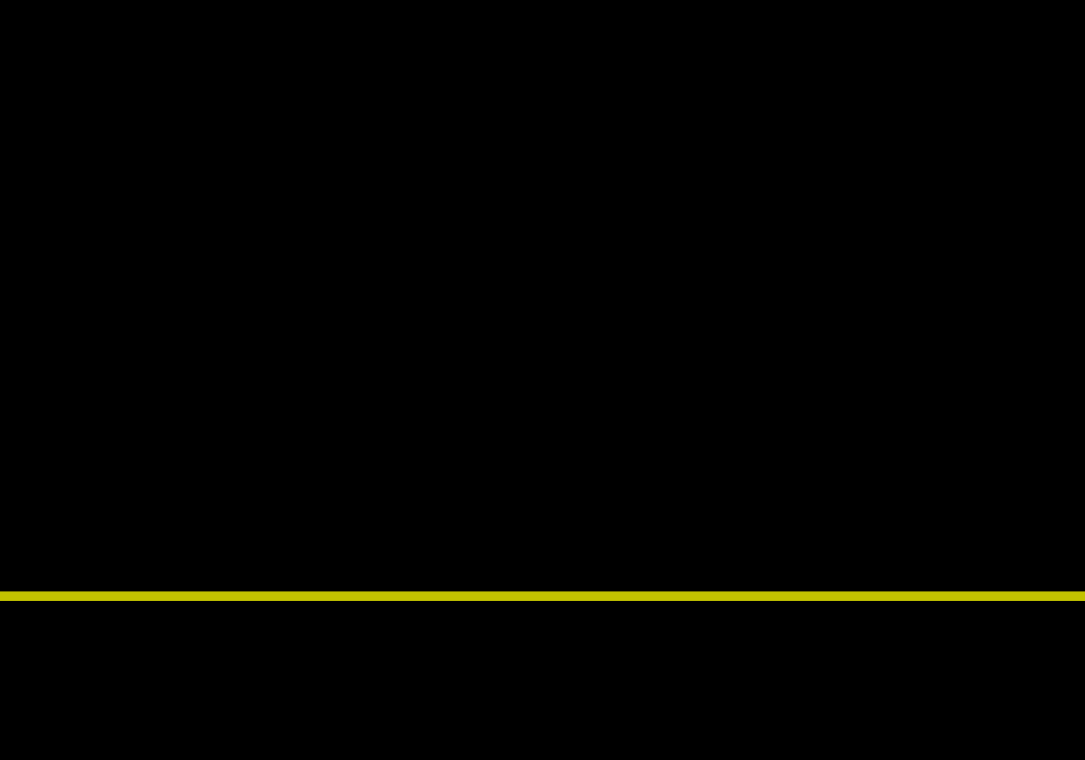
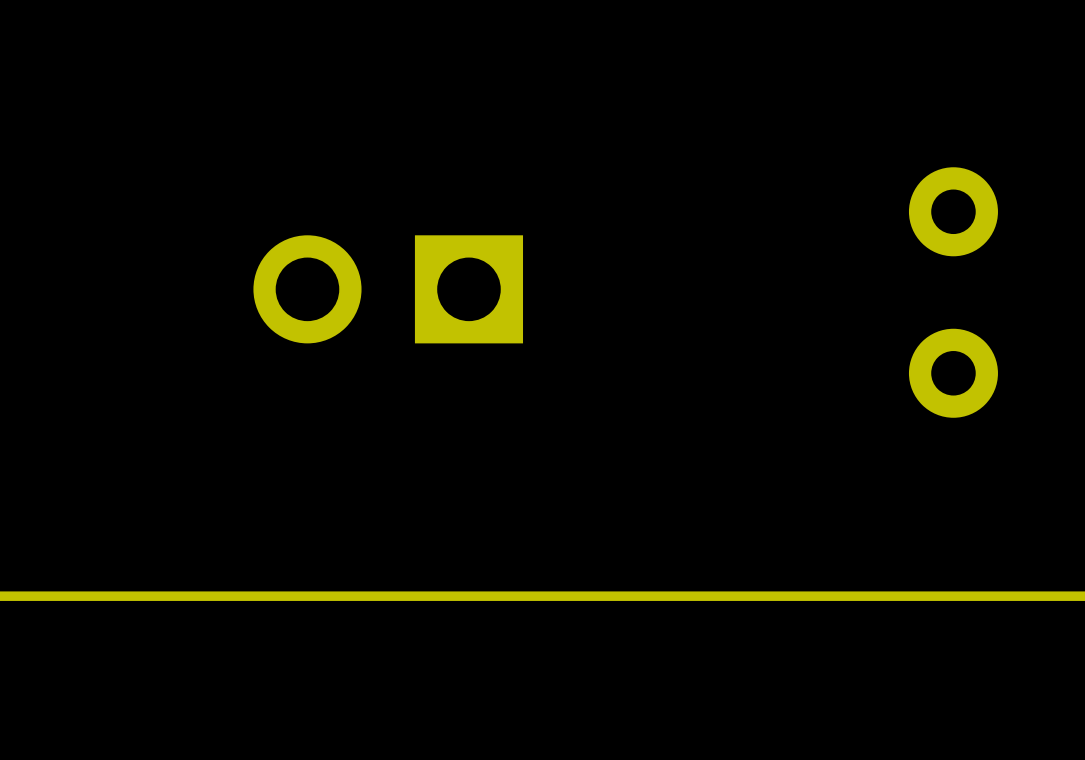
part: none -> (388, 289)
part: none -> (953, 292)

